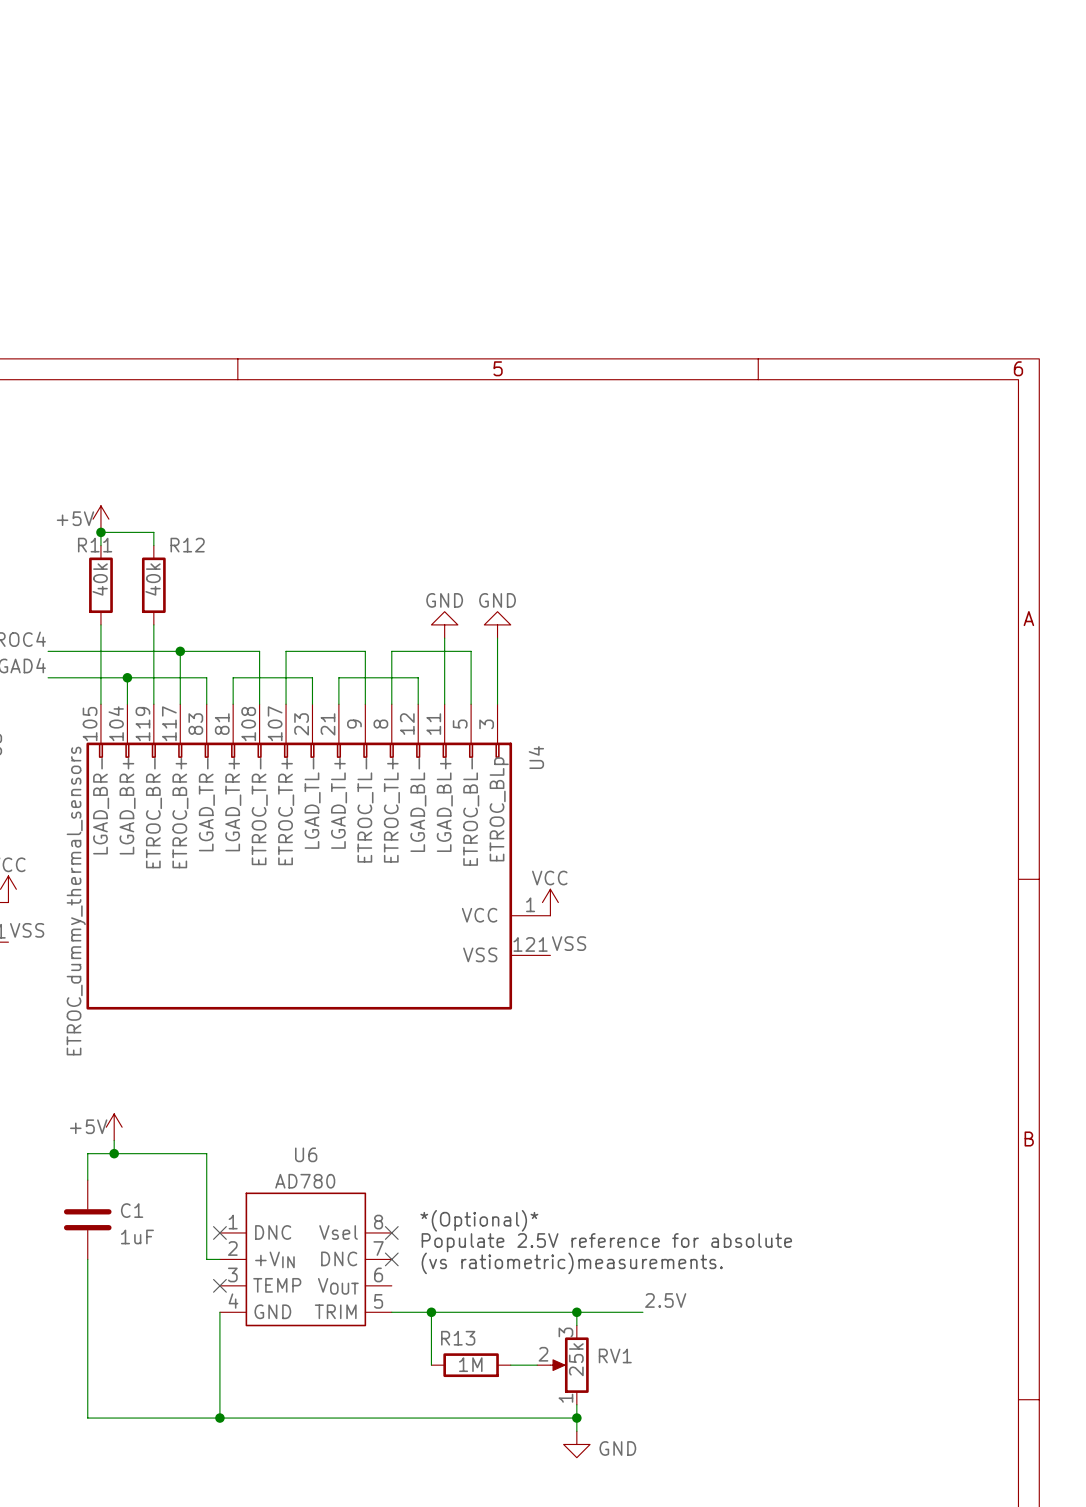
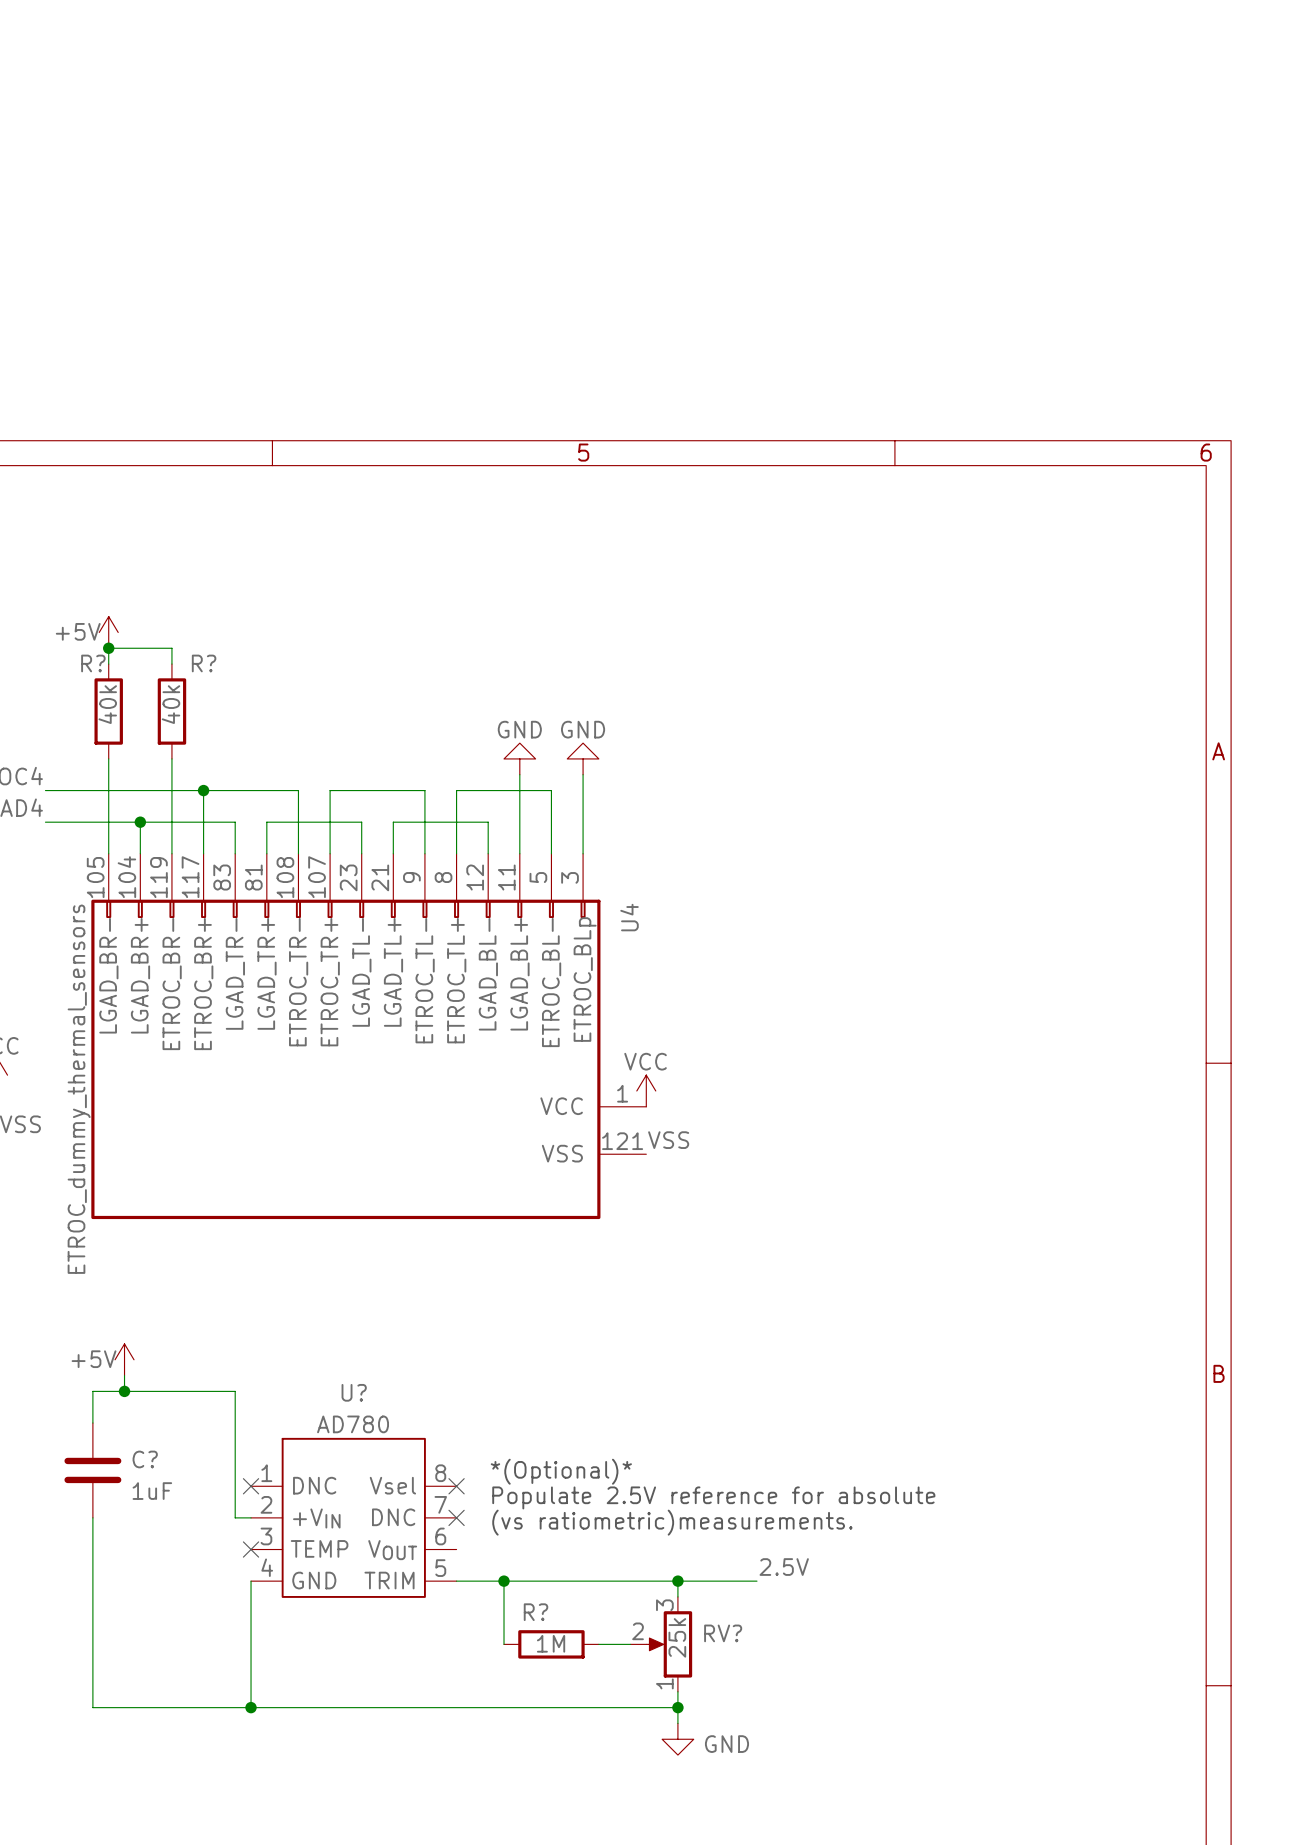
R11 name: R11 (95, 545) -> R? (93, 663)
R12 name: R12 (187, 545) -> R? (204, 663)
U6 name: U6 (306, 1154) -> U? (354, 1392)
C1 name: C1 (132, 1210) -> C? (145, 1459)
R13 name: R13 (458, 1338) -> R? (536, 1612)
RV1 name: RV1 (615, 1355) -> RV? (723, 1633)

